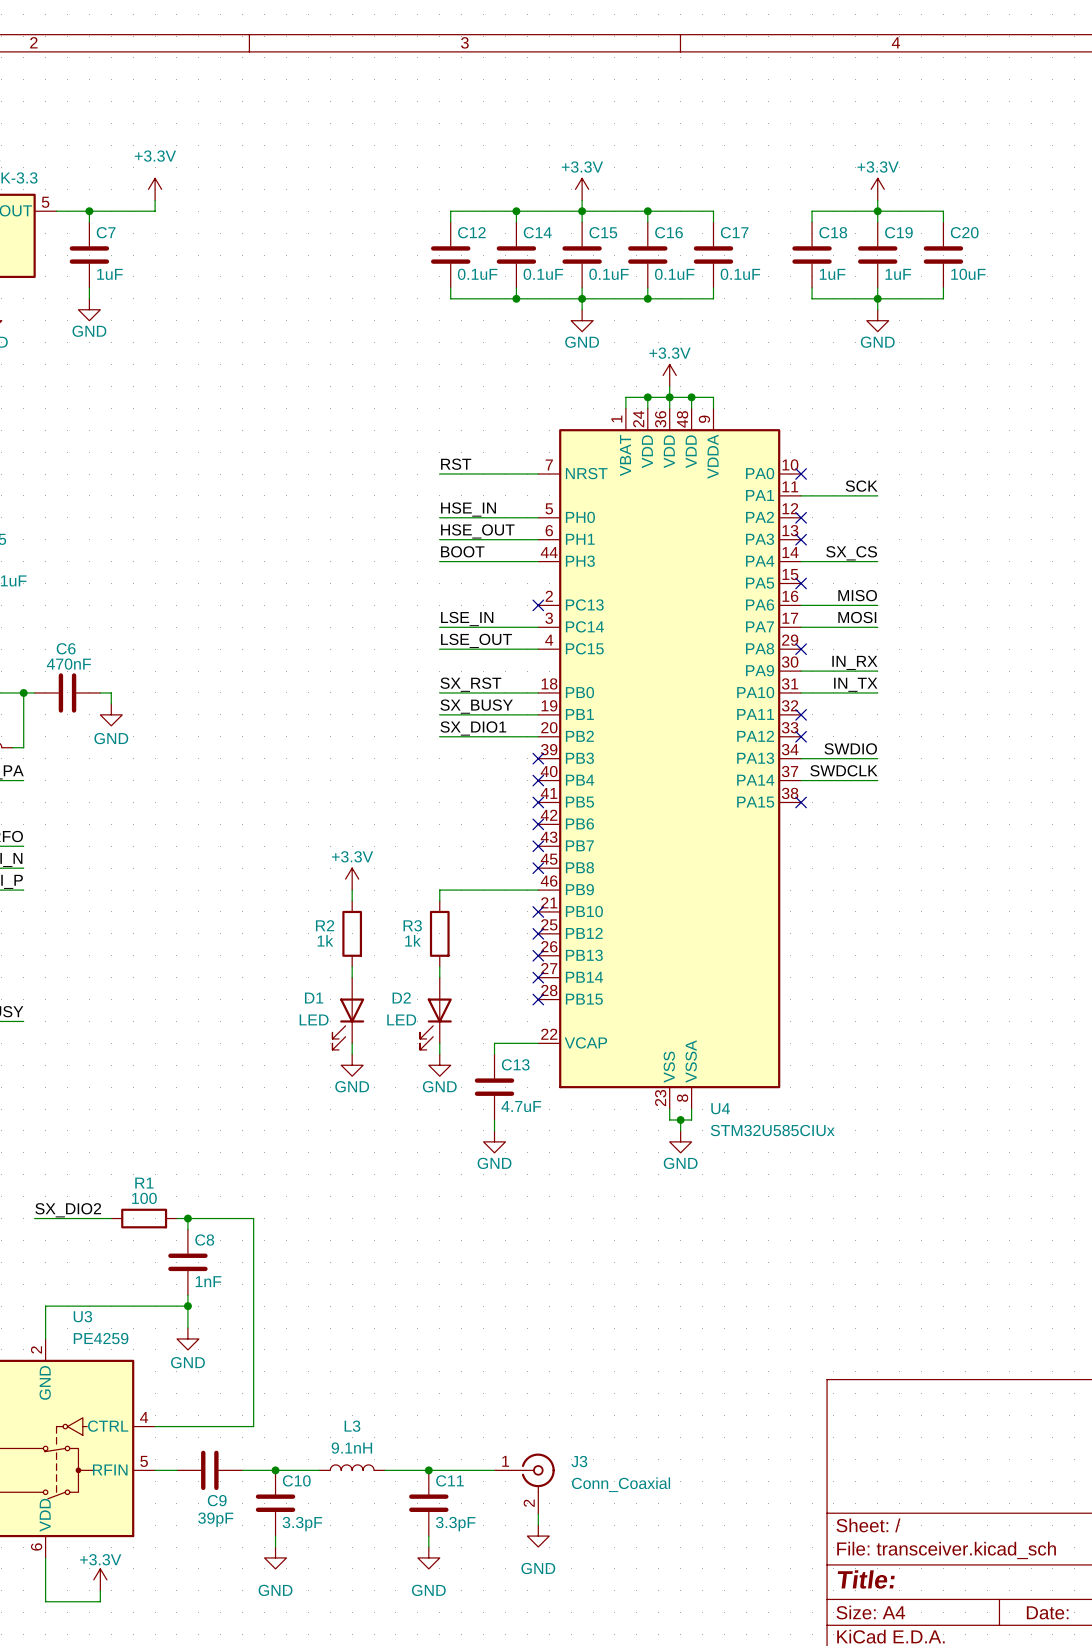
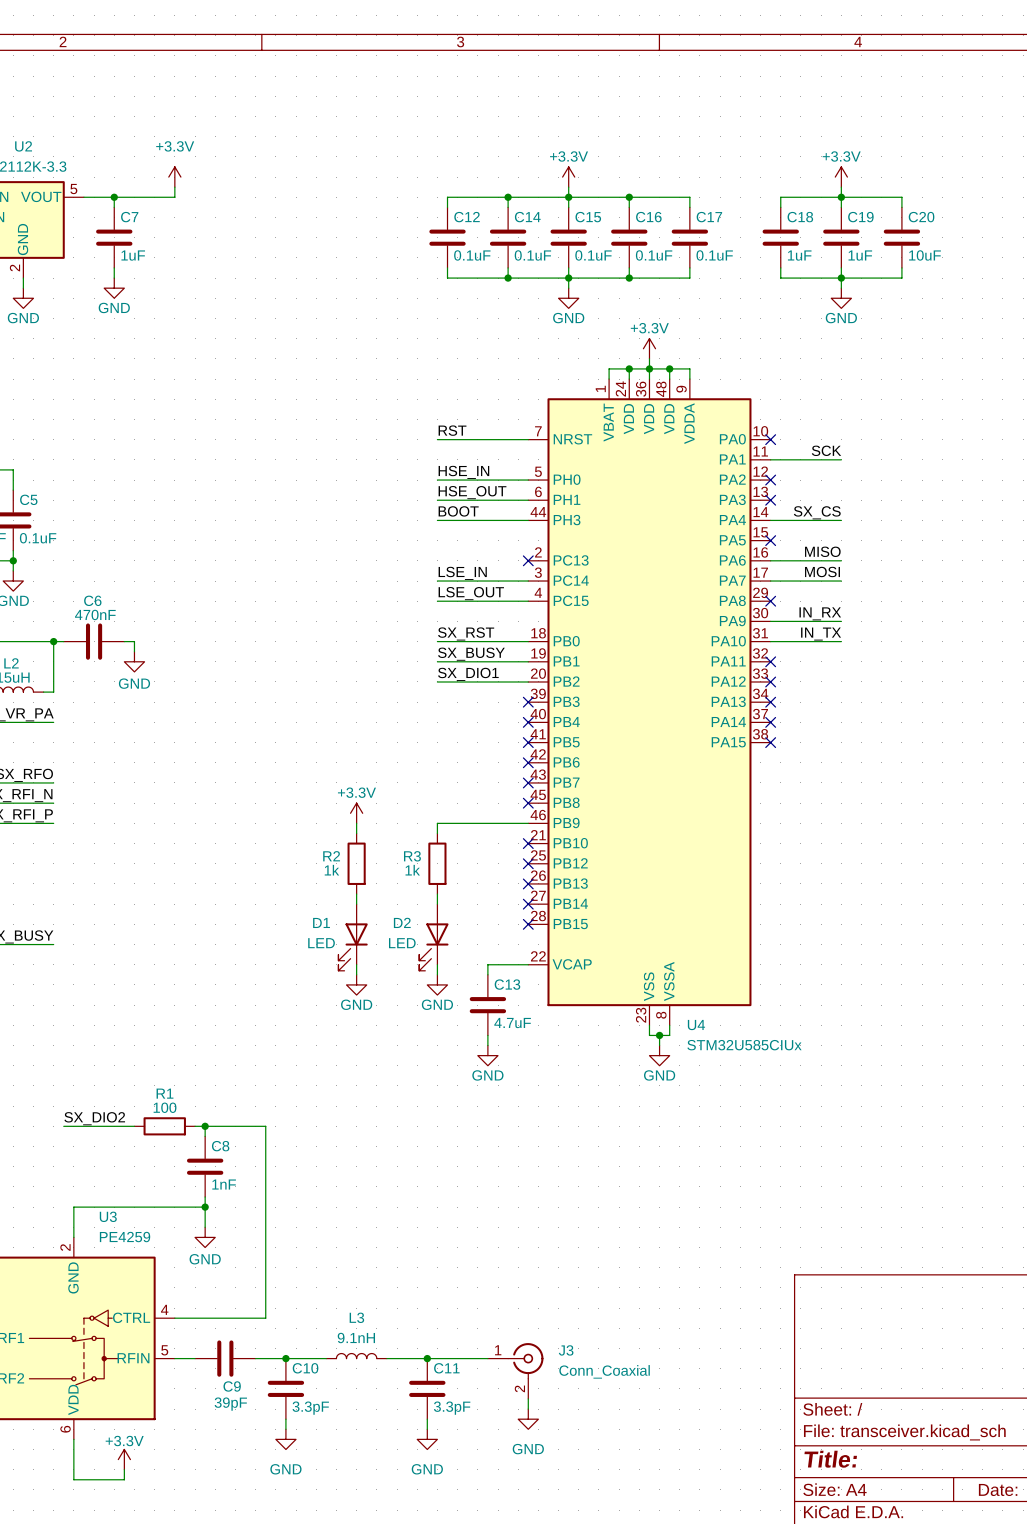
label: SWDIO (850, 748) -> none
wire: (801, 758) (877, 758) -> none
no-connect mark: none -> (770, 702)
label: SWDCLK (843, 770) -> none
wire: (801, 780) (877, 780) -> none
no-connect mark: none -> (770, 722)

